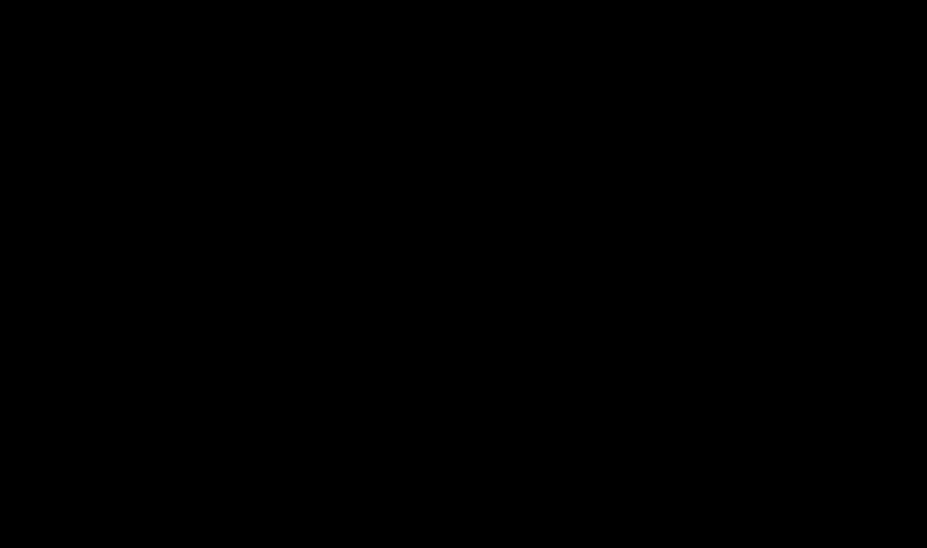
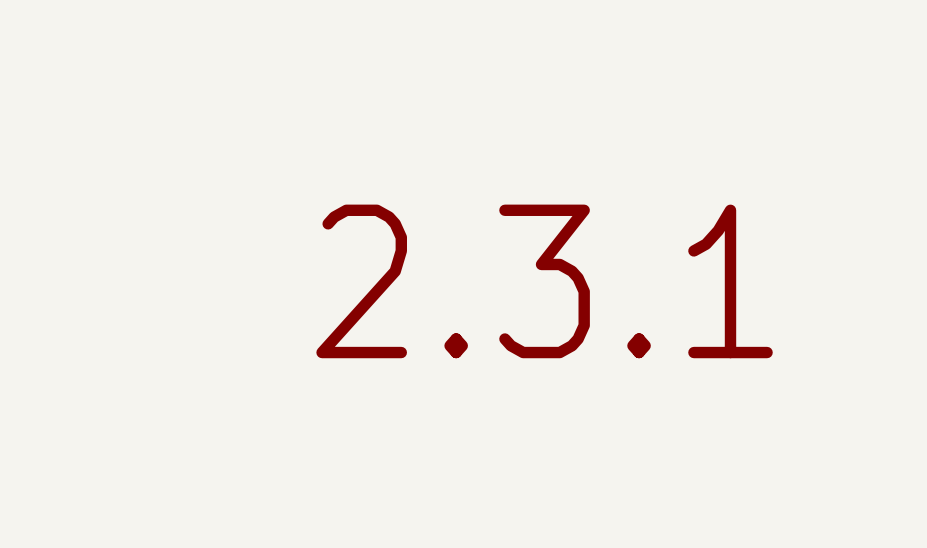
text: none -> 2.3.1 (544, 281)

